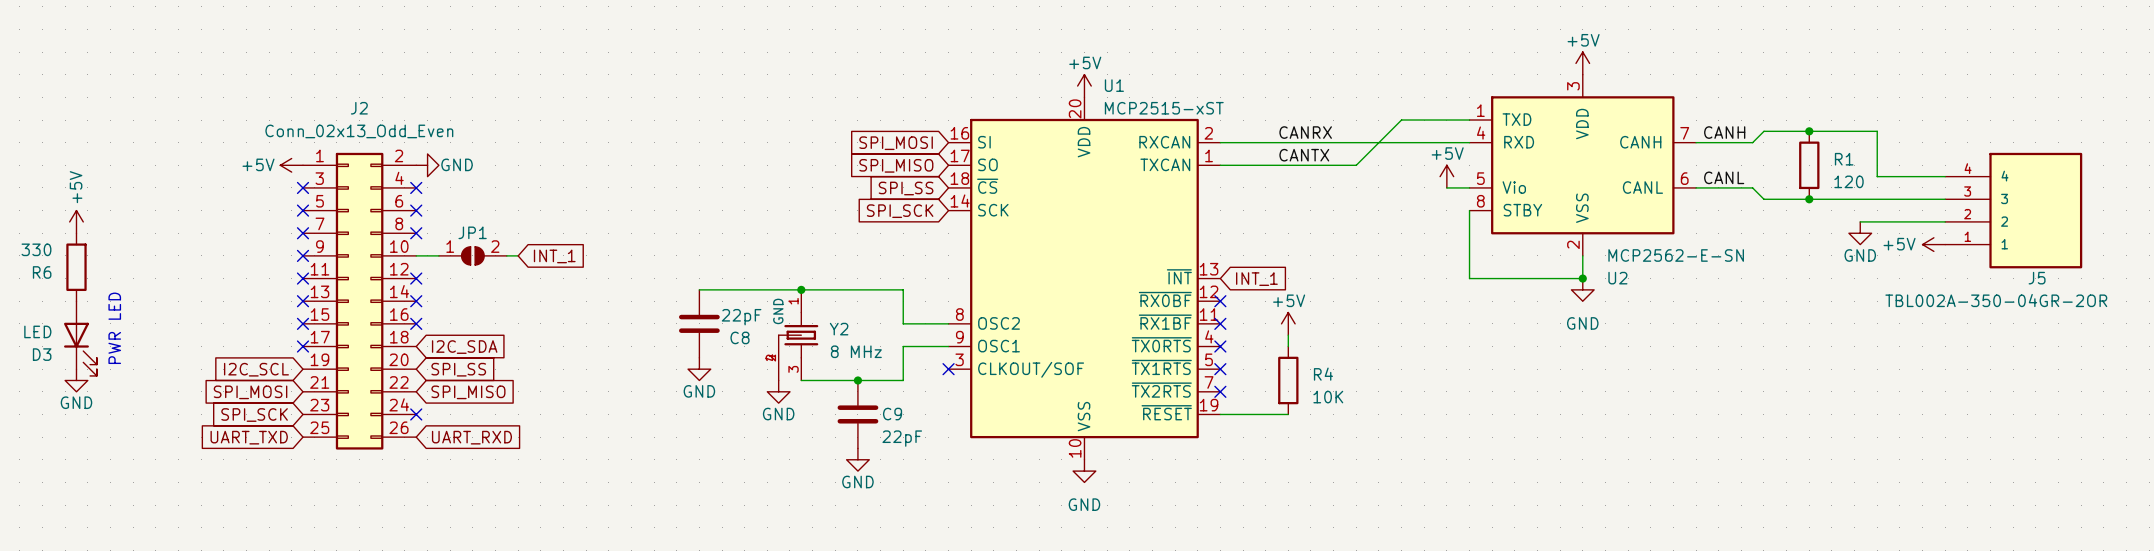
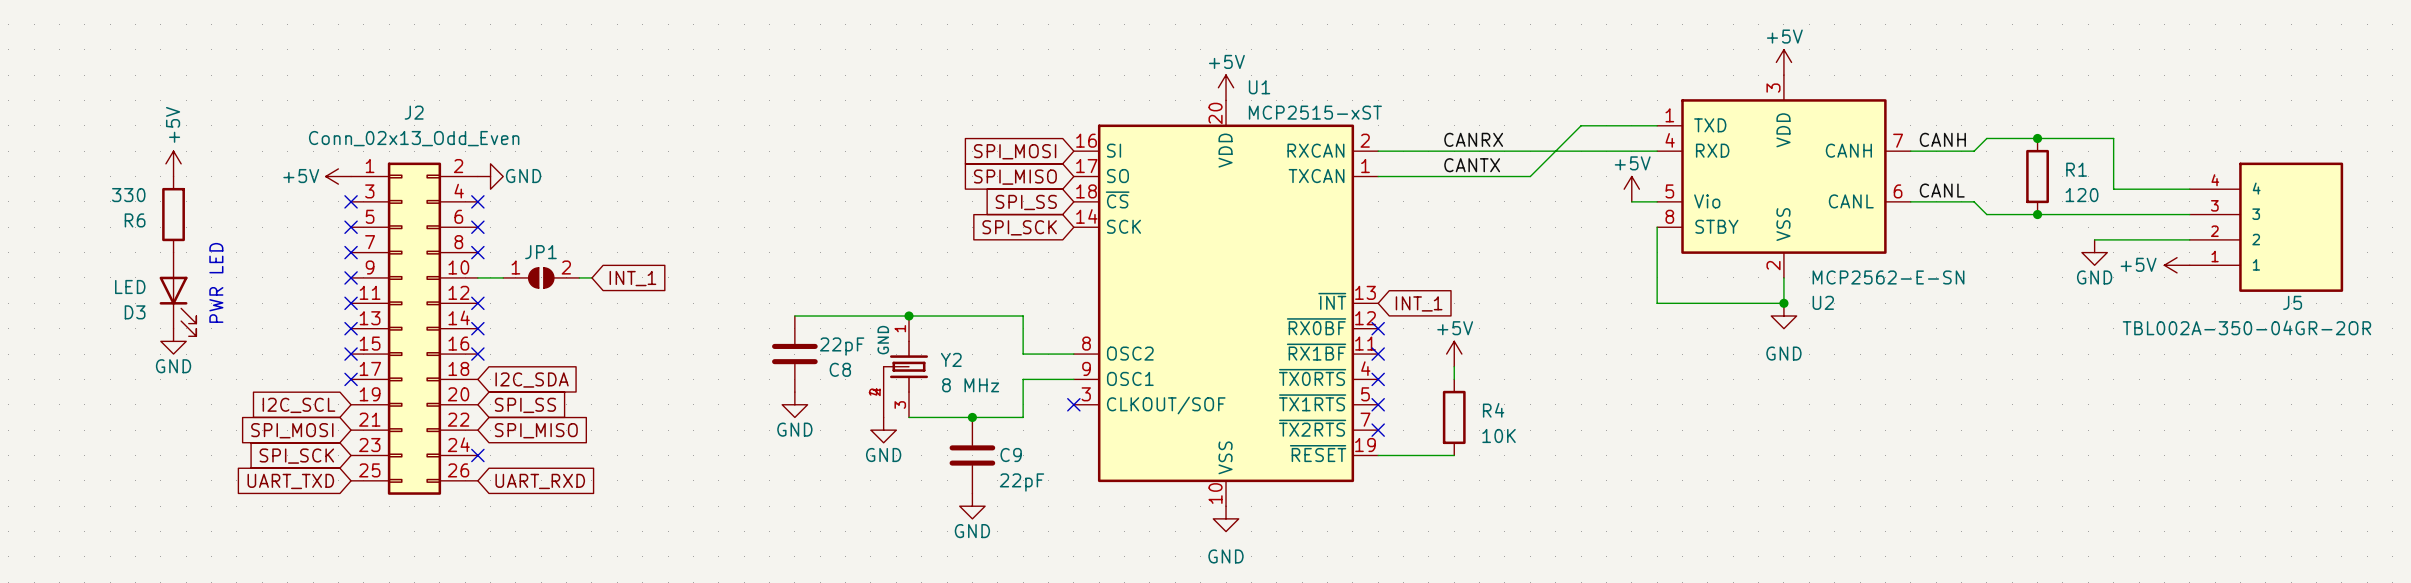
power symbol position: +5V (76, 221) -> +5V (173, 163)
R6 position: (76, 267) -> (173, 214)
text position: PWR LED (114, 328) -> PWR LED (216, 282)
D3 position: (80, 338) -> (177, 294)
power symbol position: GND (76, 380) -> GND (173, 341)

